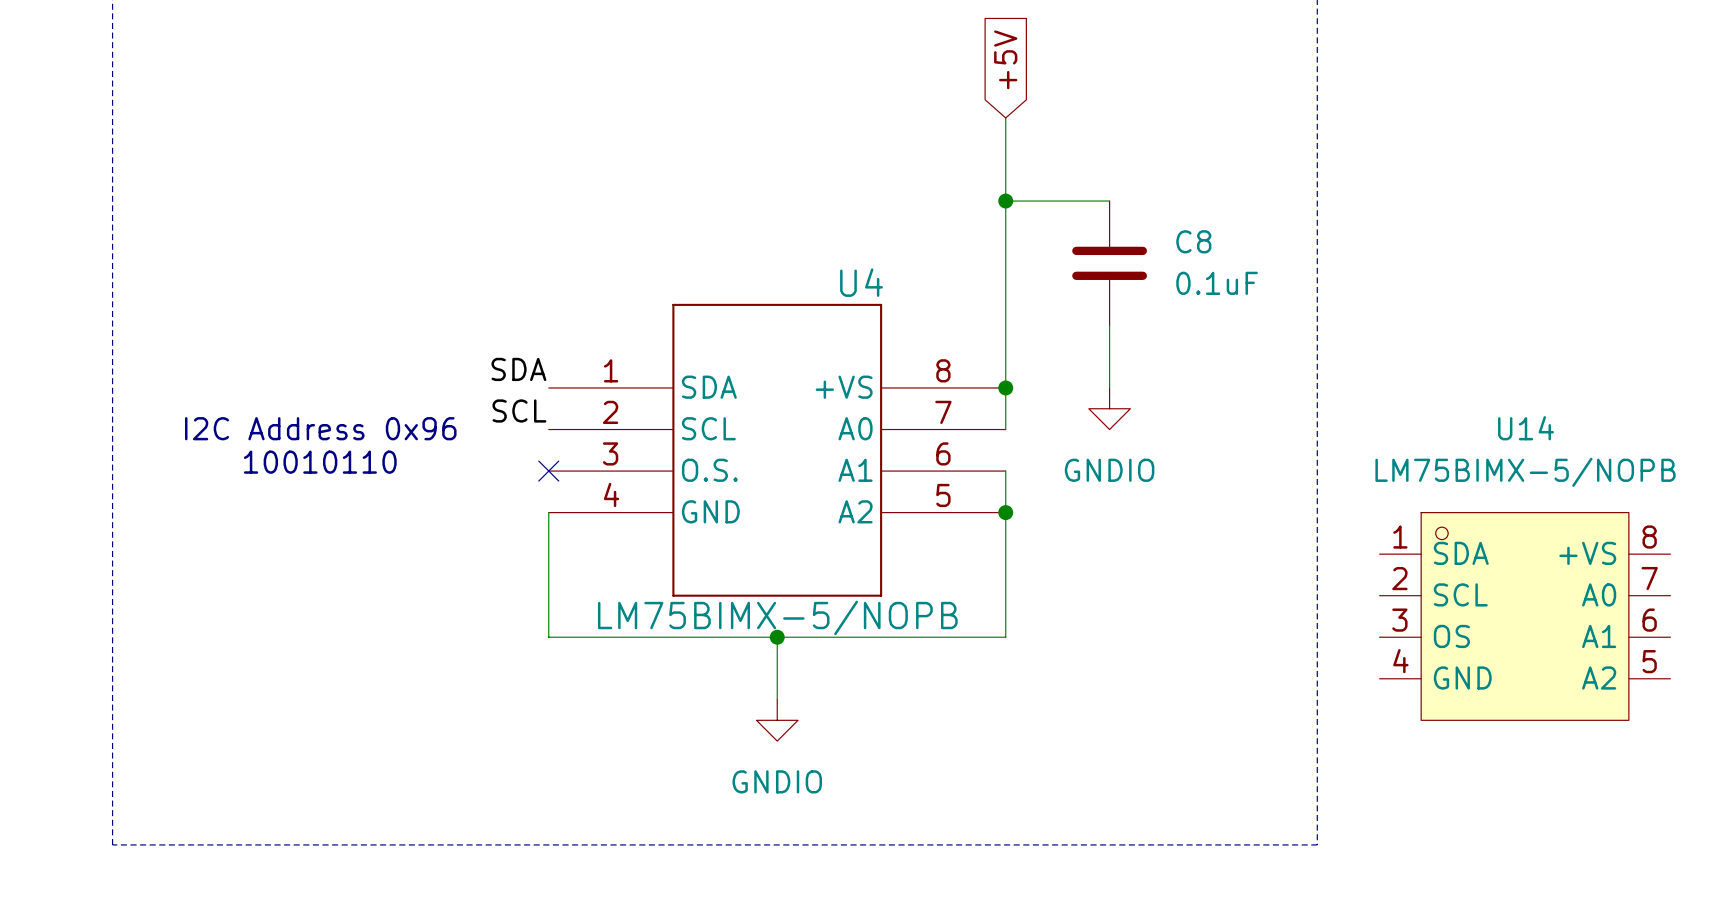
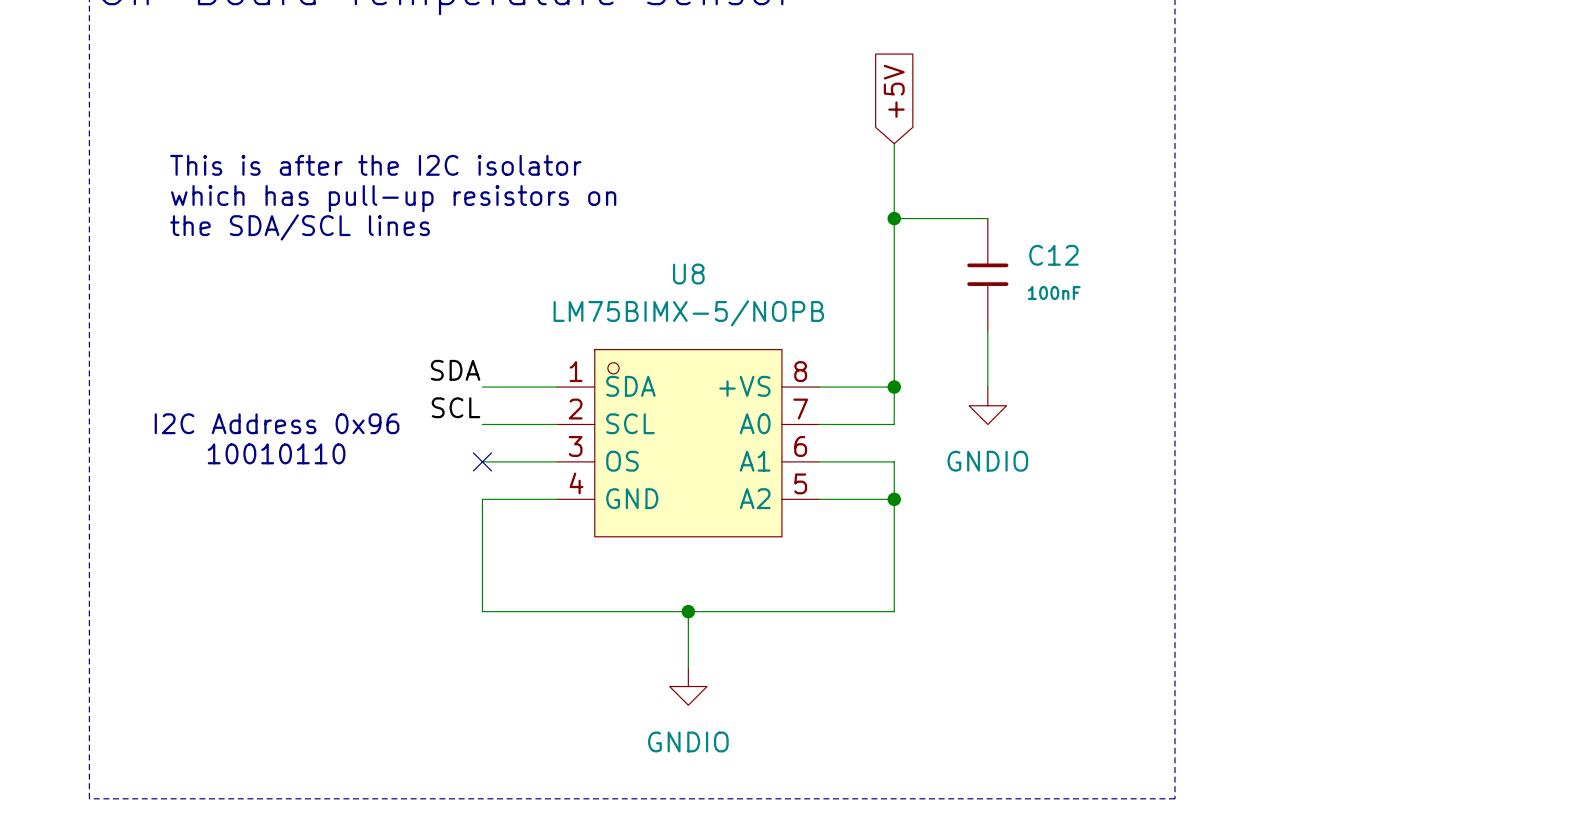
text: none -> This is after the I2C isolator (375, 165)
text: none -> which has pull-up resistors on (393, 198)
text: none -> the SDA/SCL lines (300, 227)
C8: 0.1uF (1109, 263) -> none
C12: none -> 100nF (987, 274)
U4: LM75BIMX-5/NOPB (777, 450) -> none
U8: none -> LM75BIMX-5/NOPB (688, 443)
U14: LM75BIMX-5/NOPB (1525, 616) -> none

